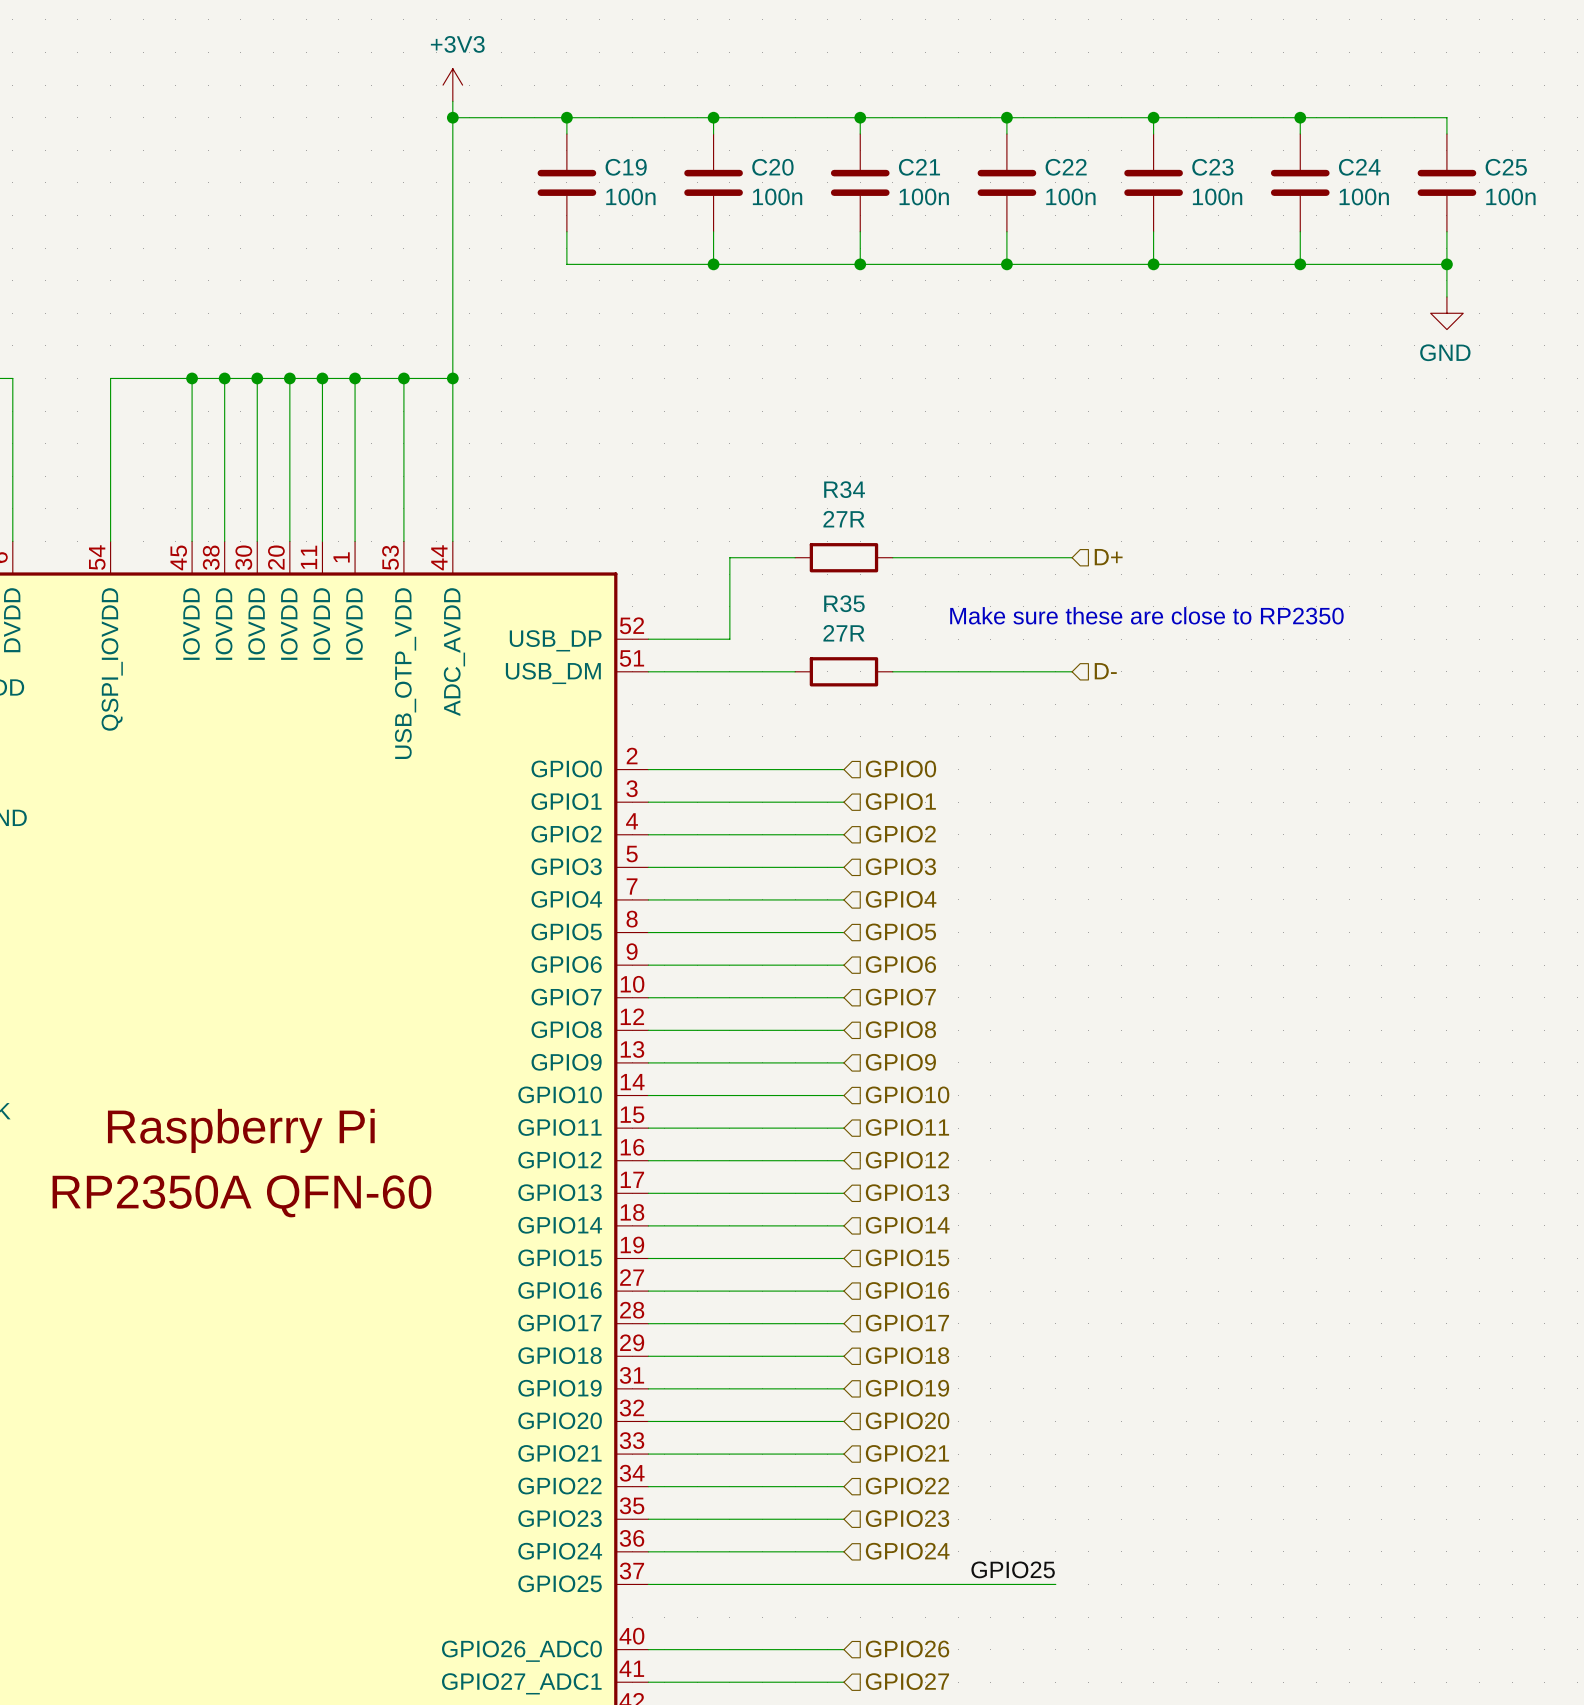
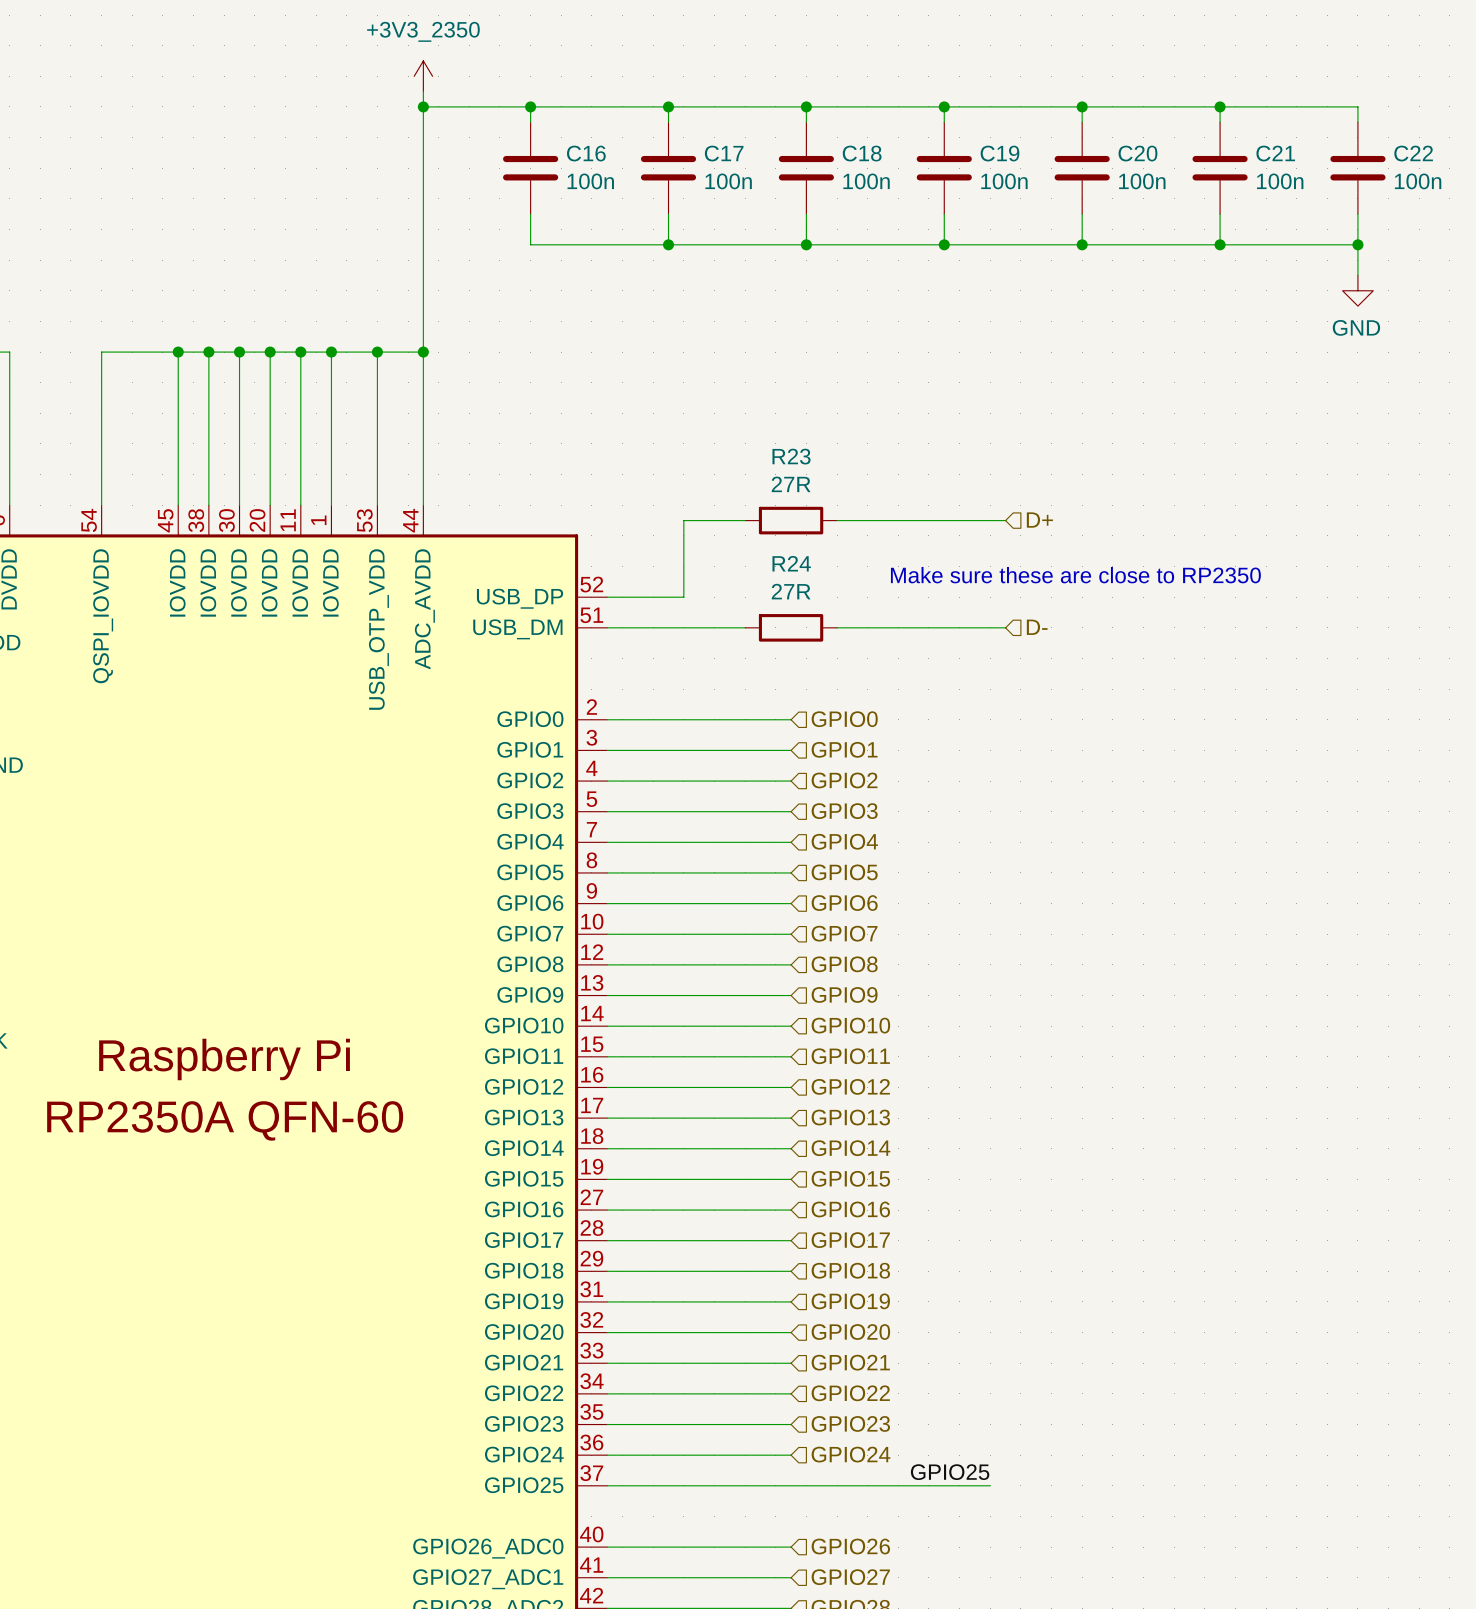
power symbol: +3V3 (452, 85) -> +3V3_2350 (423, 76)
C19 name: C19 (626, 167) -> C16 (586, 153)
C20 name: C20 (772, 167) -> C17 (724, 153)
C21 name: C21 (919, 167) -> C18 (862, 153)
C22 name: C22 (1066, 167) -> C19 (999, 153)
C23 name: C23 (1212, 167) -> C20 (1137, 153)
C24 name: C24 (1359, 167) -> C21 (1275, 153)
C25 name: C25 (1506, 167) -> C22 (1413, 153)
R34 name: R34 (844, 489) -> R23 (791, 456)
R35 name: R35 (844, 603) -> R24 (791, 563)

